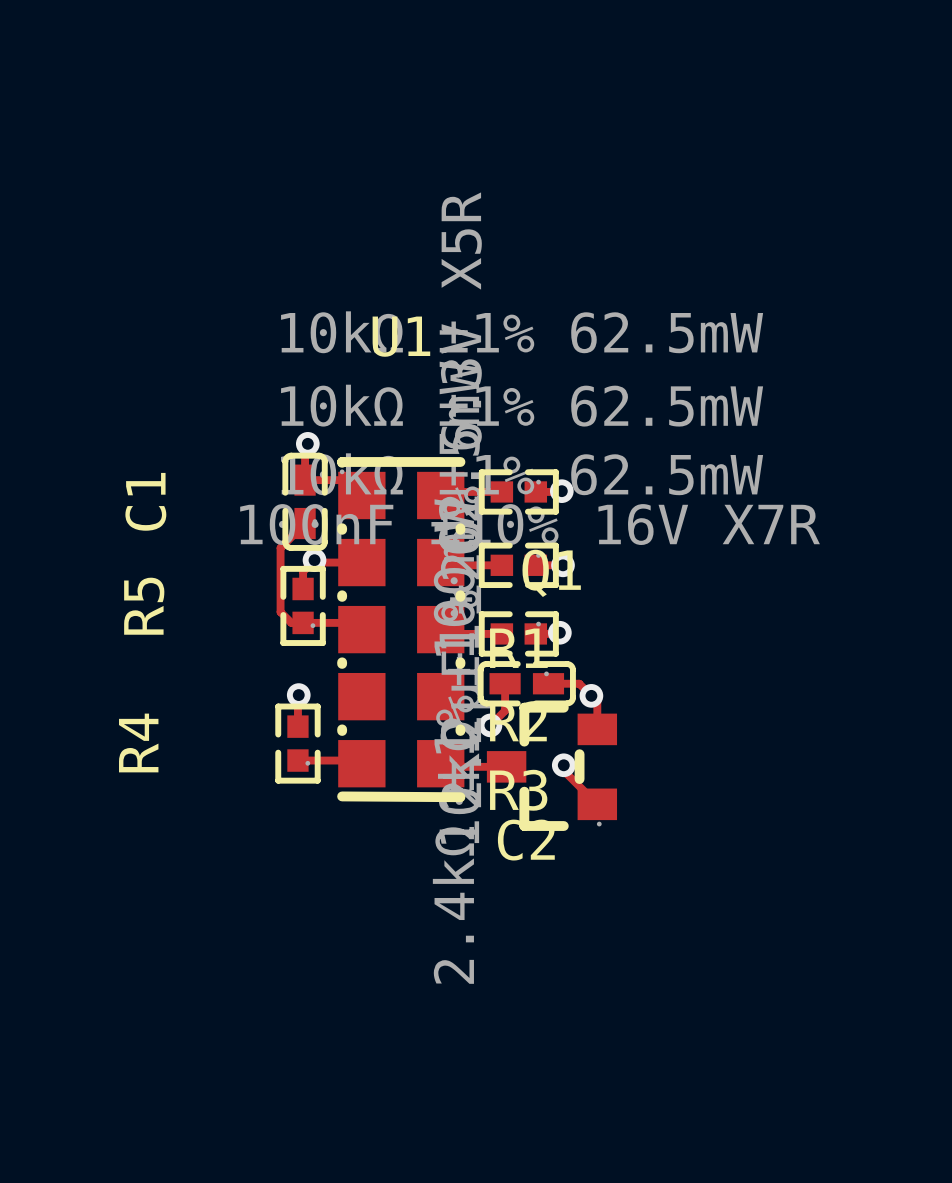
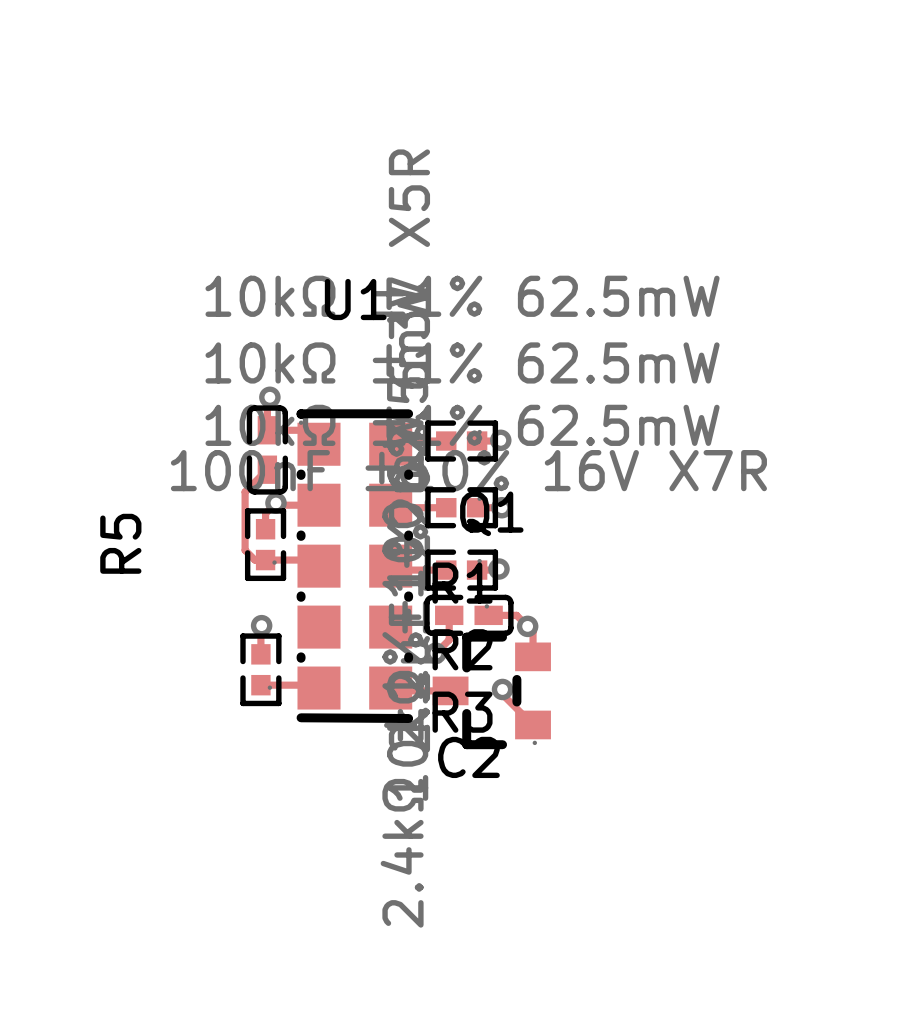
C1 name: C1 (145, 501) -> none
R4 name: R4 (138, 742) -> none

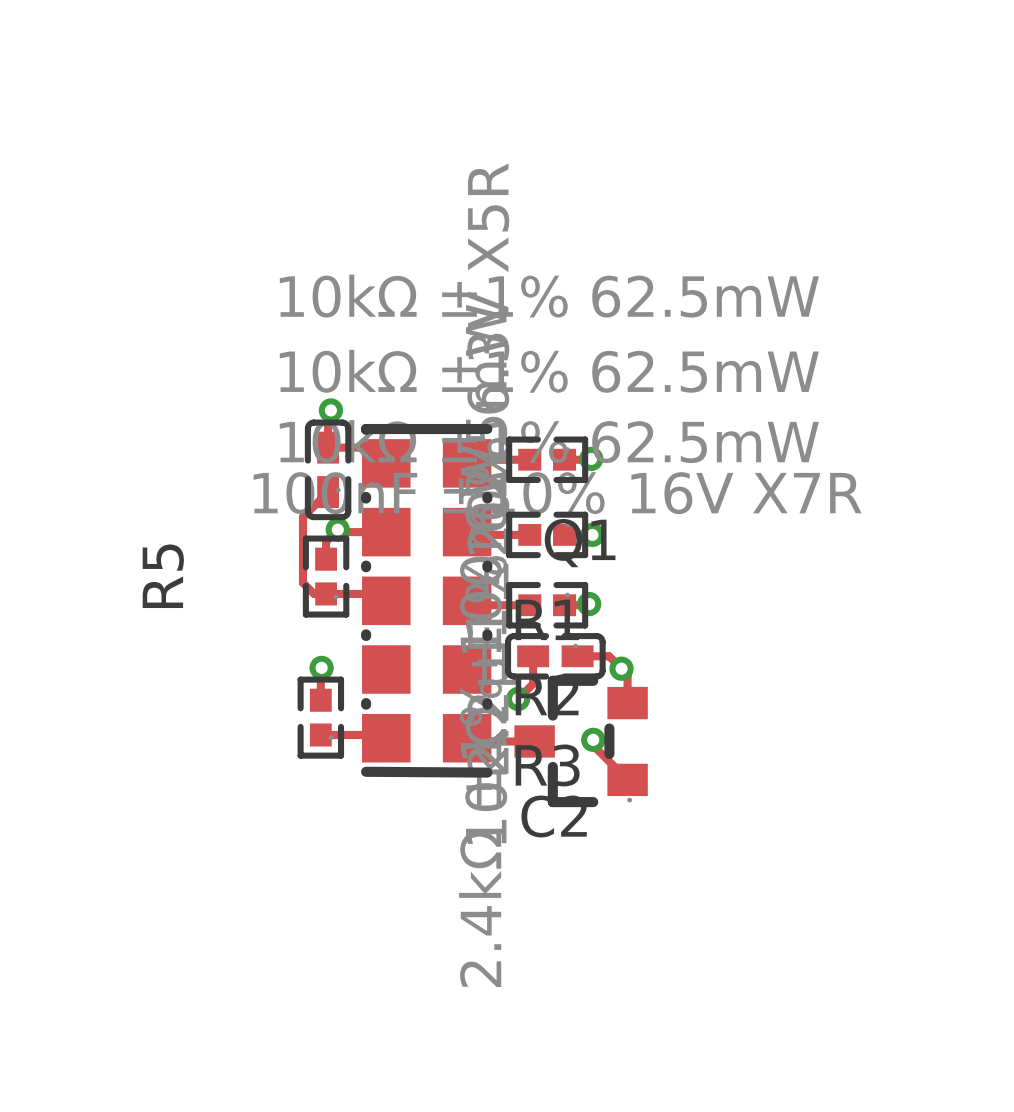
U1 name: U1 (355, 299) -> none

